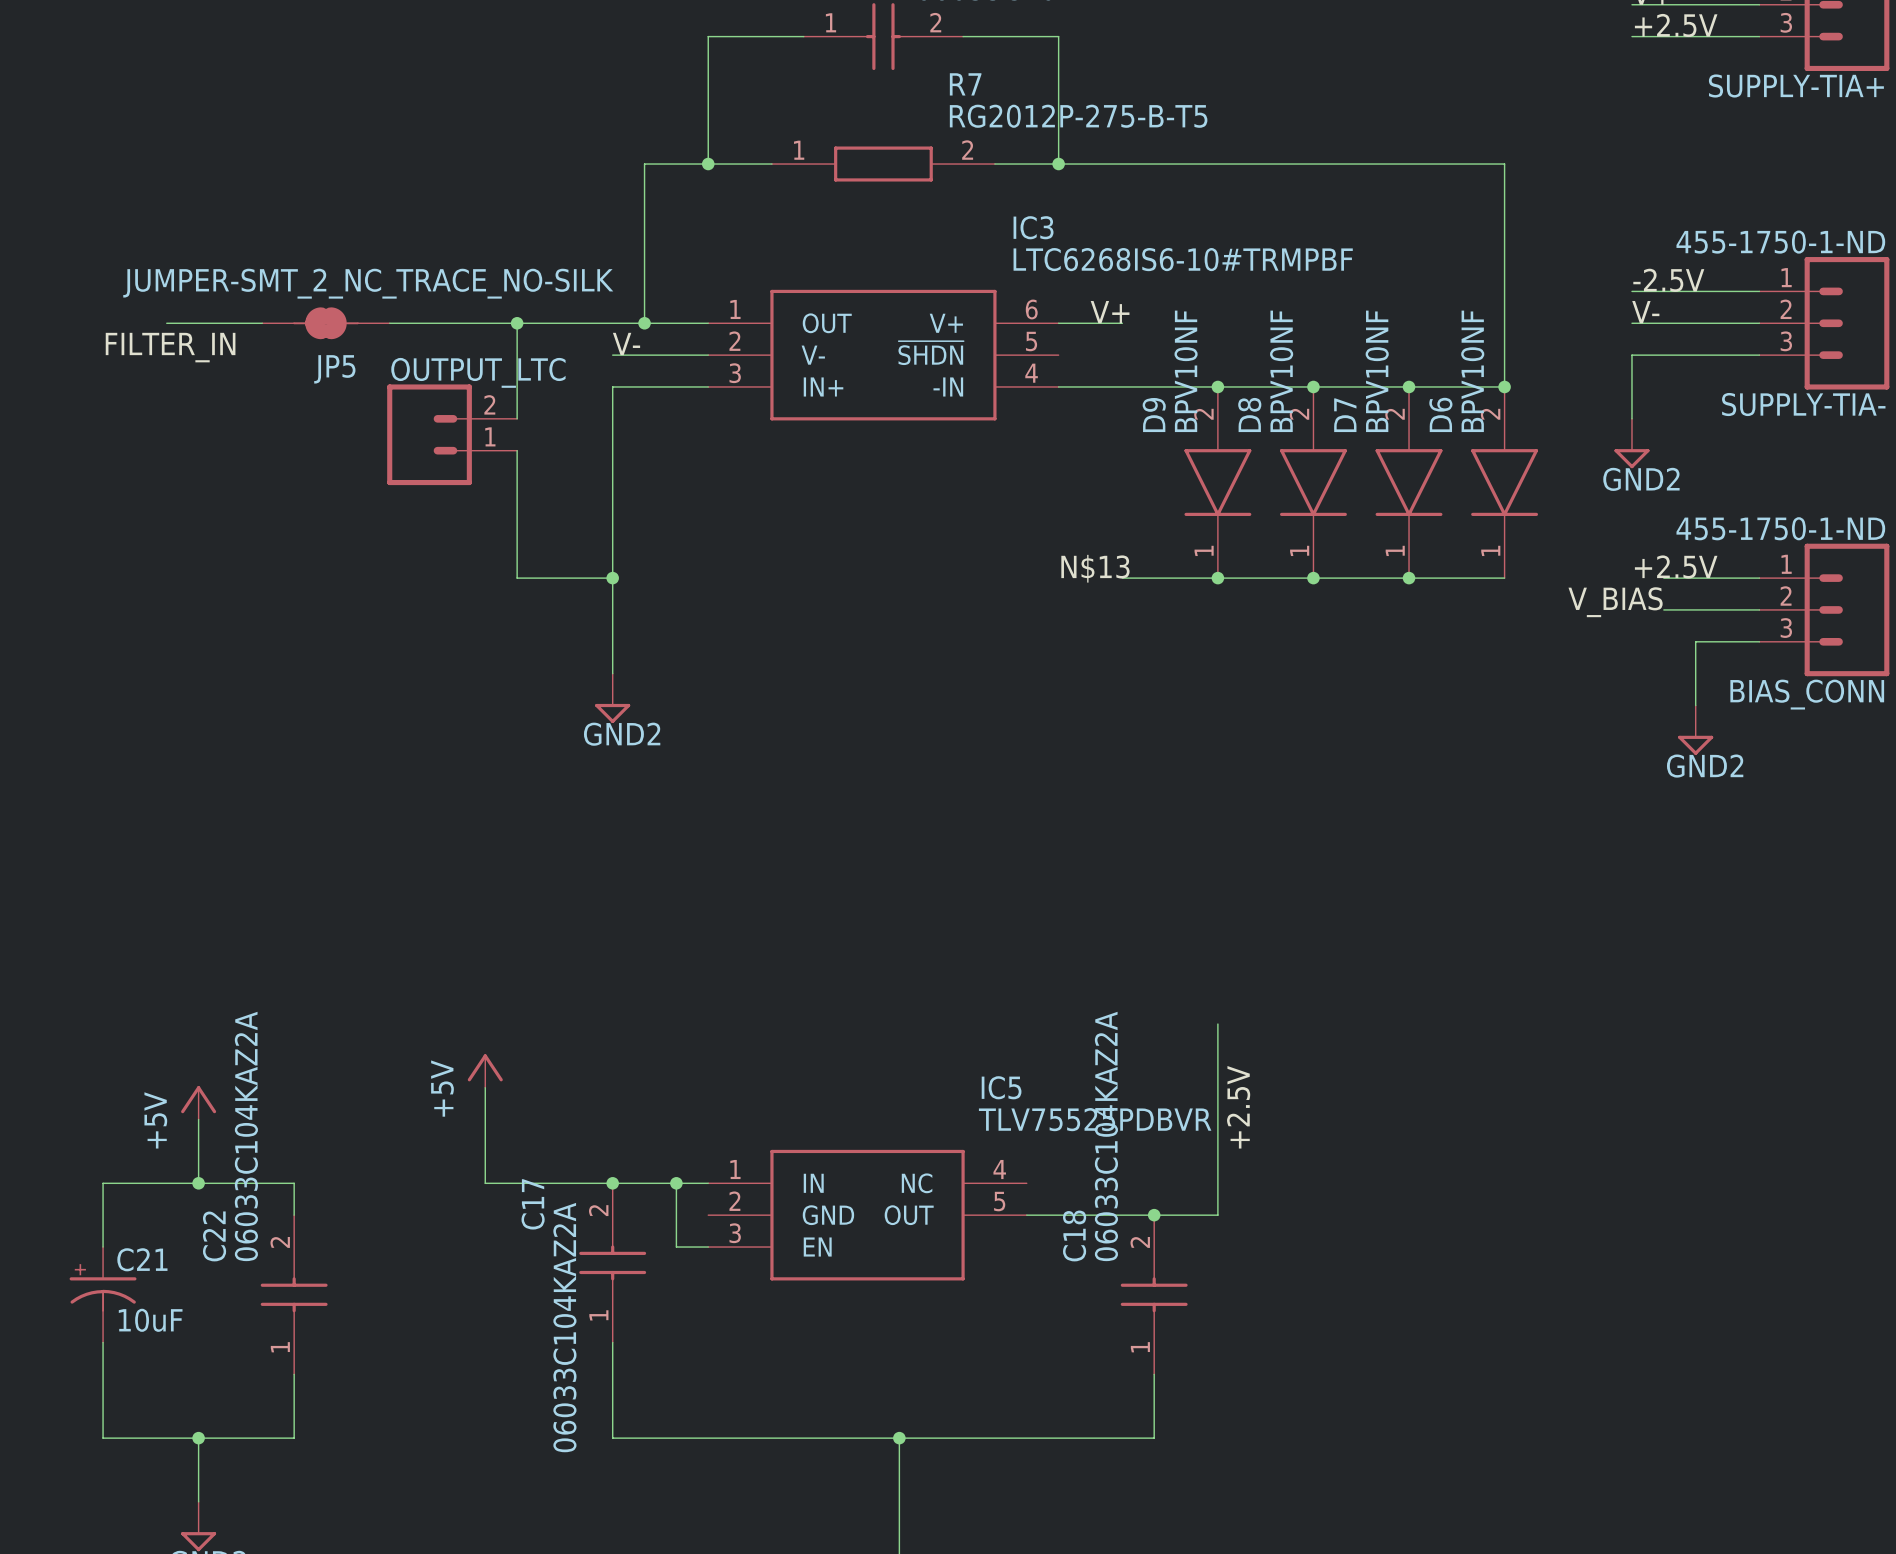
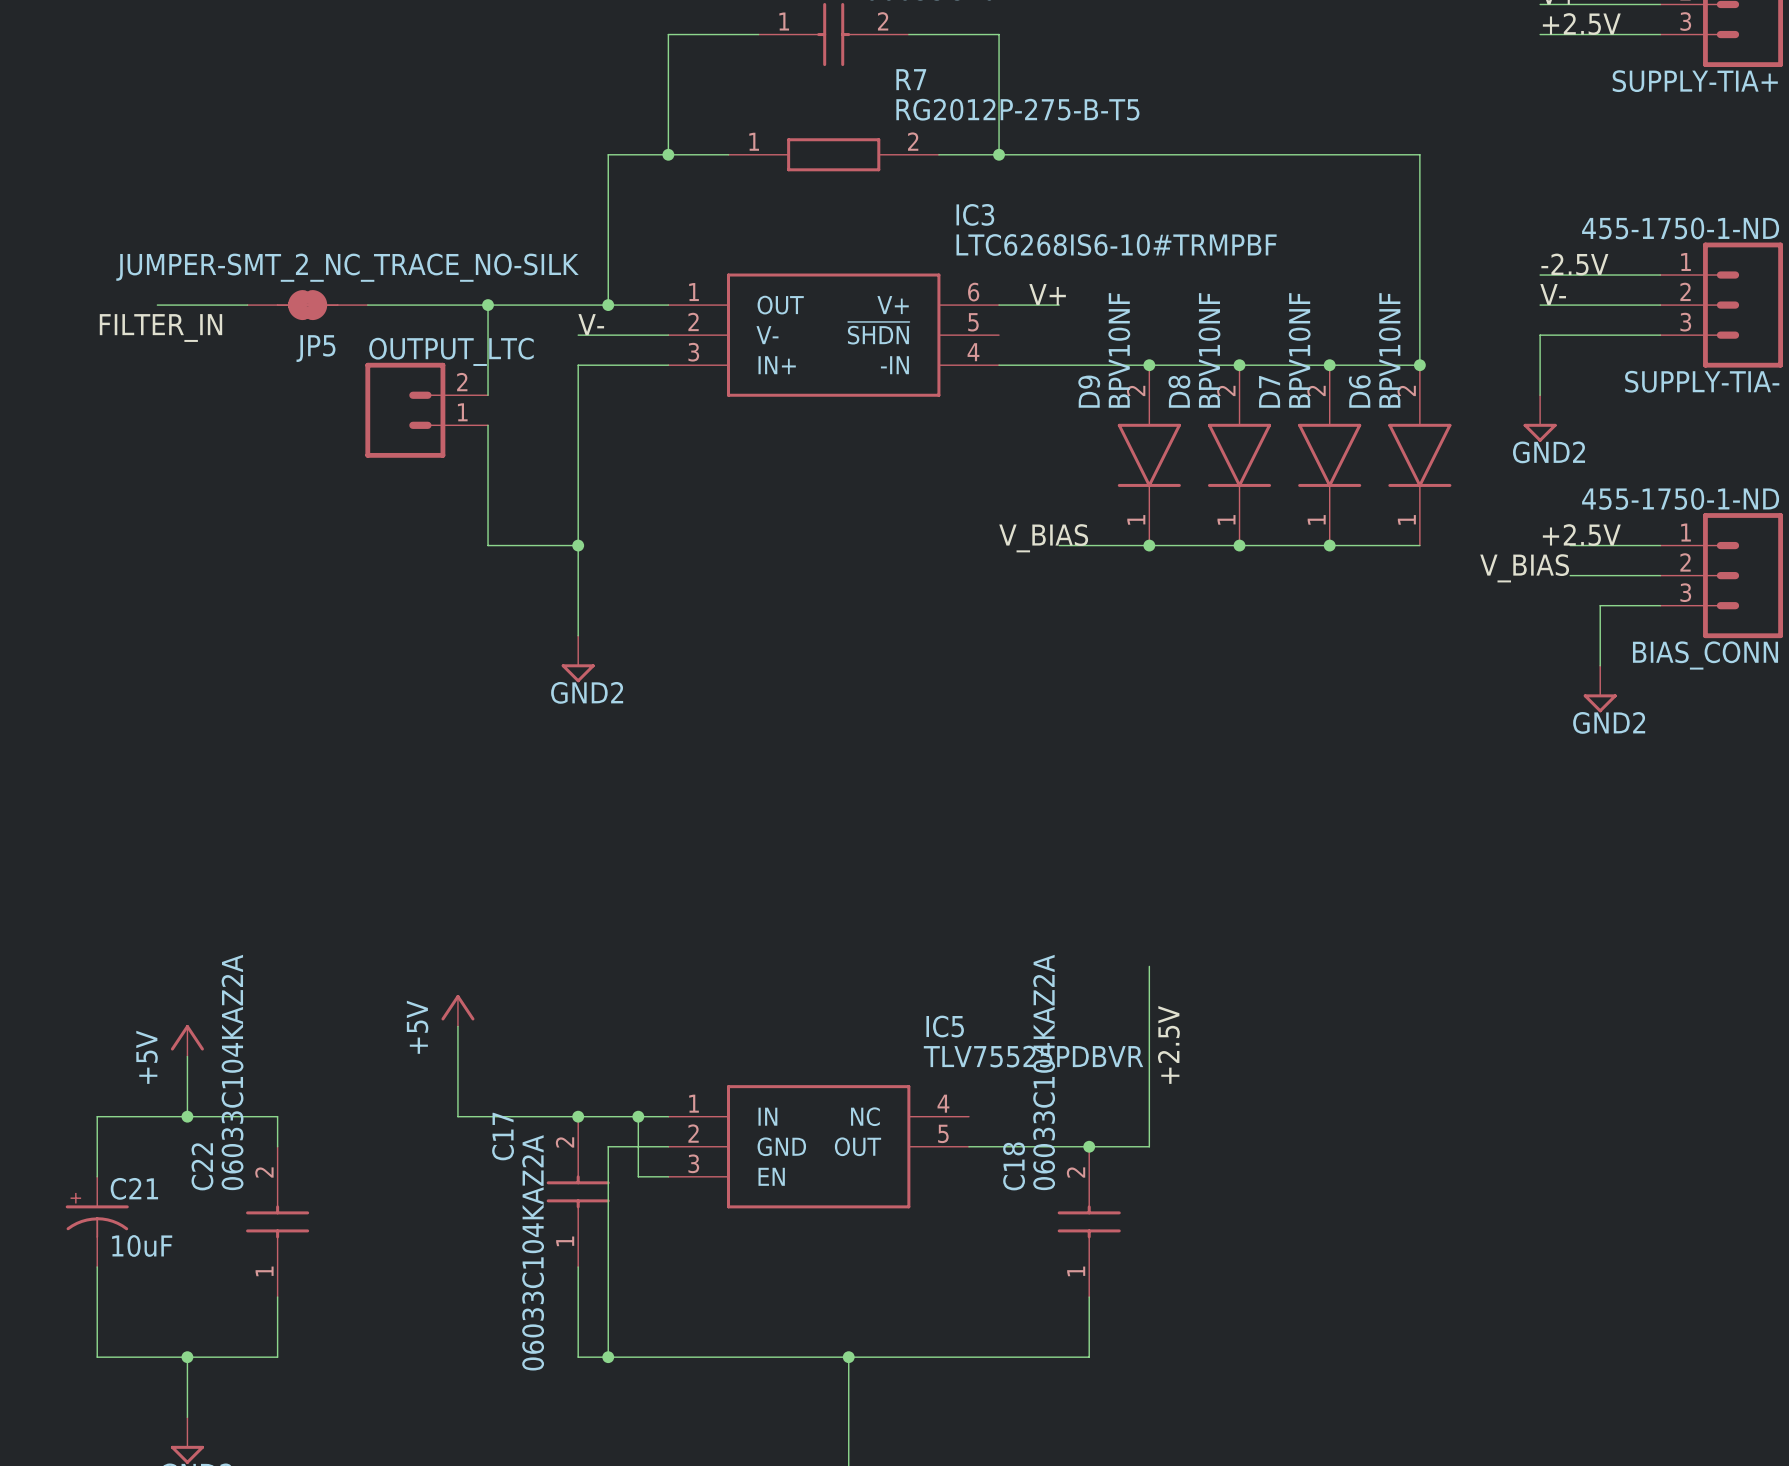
label: N$13 (1095, 568) -> V_BIAS (1043, 538)
wire: none -> (668, 1146) (608, 1146) (608, 1357)
junction: none -> (608, 1357)

